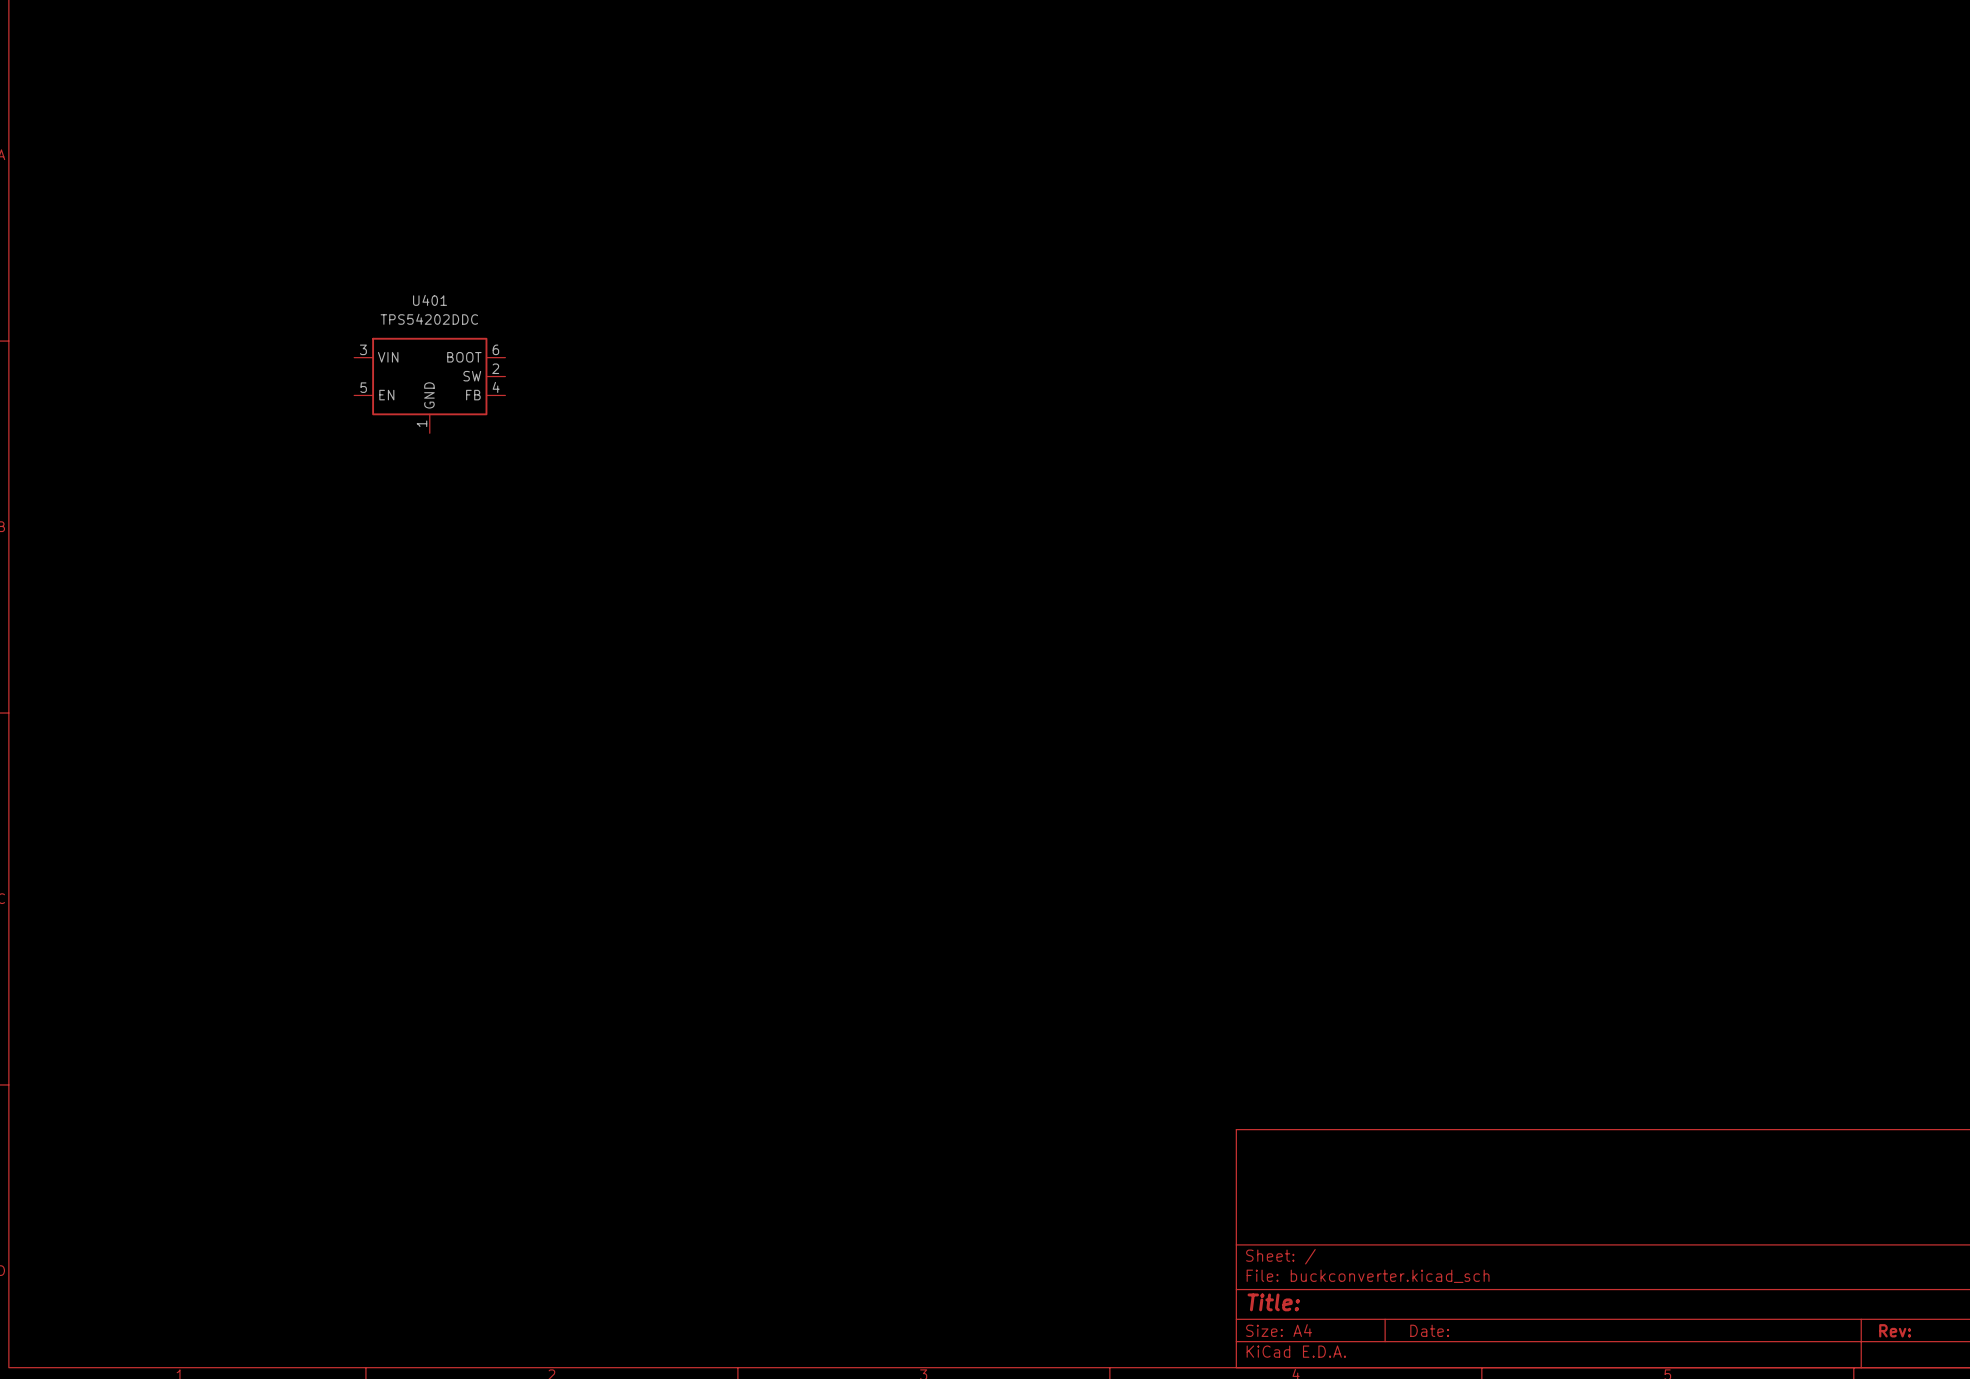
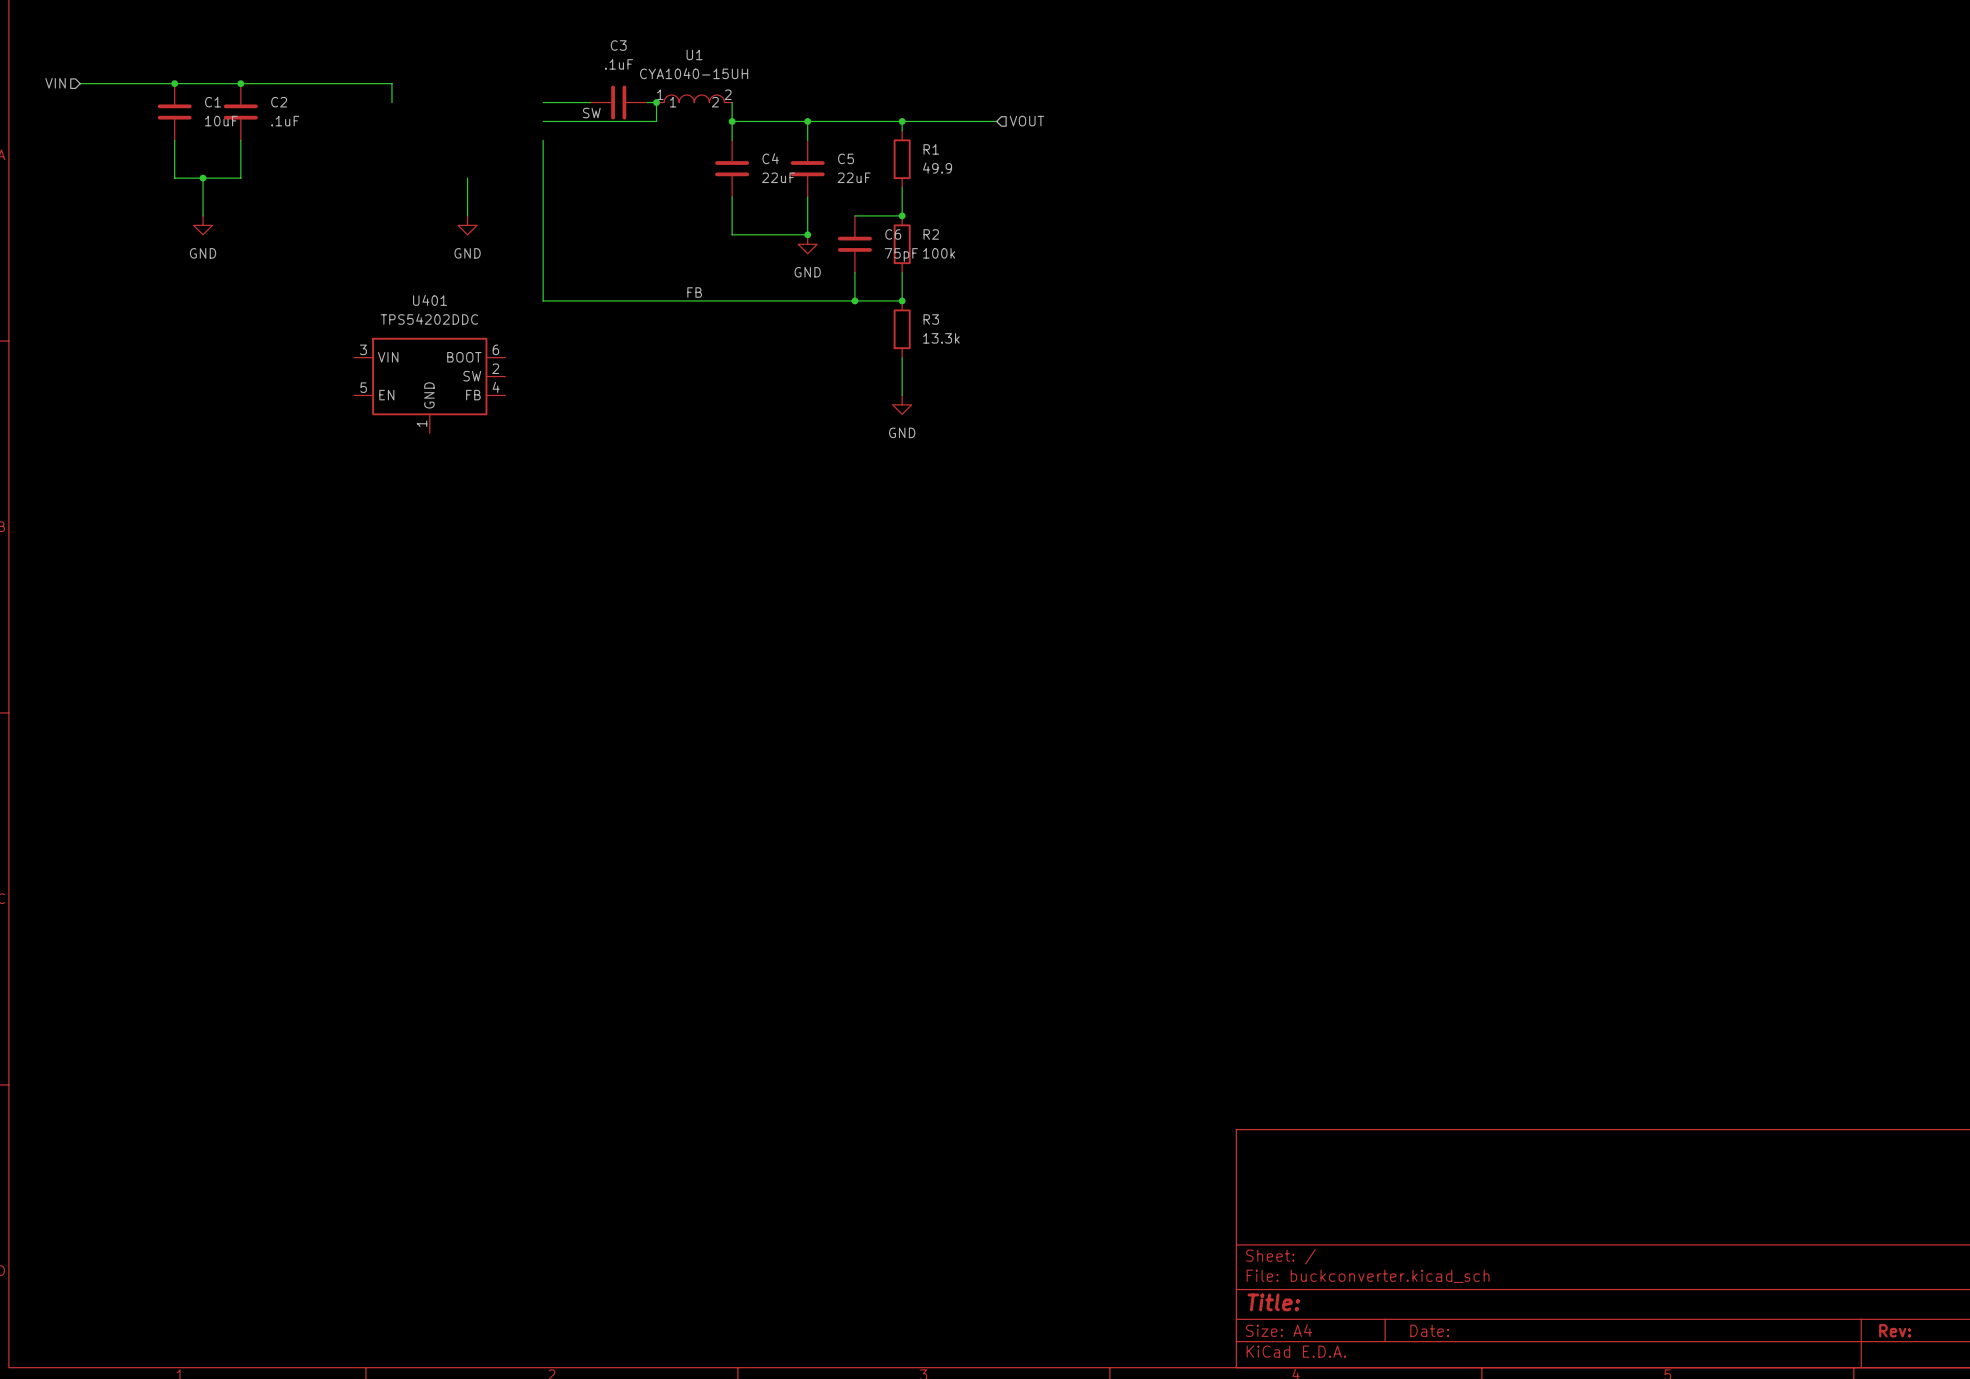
hierarchical label: none -> VIN (55, 83)
wire: none -> (80, 83) (391, 83) (391, 102)
junction: none -> (174, 83)
junction: none -> (240, 83)
U1: none -> CYA1040-15UH (694, 98)
wire: none -> (543, 102) (590, 102)
C3: none -> .1uF (618, 102)
wire: none -> (647, 102) (656, 102) (656, 121) (543, 121)
junction: none -> (656, 102)
wire: none -> (732, 102) (732, 140)
C1: none -> 10uF (174, 112)
C2: none -> .1uF (240, 112)
label: none -> SW (591, 113)
wire: none -> (732, 121) (996, 121)
junction: none -> (732, 121)
wire: none -> (807, 121) (807, 140)
junction: none -> (807, 121)
wire: none -> (902, 121) (902, 130)
junction: none -> (902, 121)
hierarchical label: none -> VOUT (1026, 121)
wire: none -> (174, 140) (174, 178) (240, 178) (240, 140)
wire: none -> (543, 140) (543, 300) (902, 300) (902, 272)
R1: none -> 49.9 (902, 159)
C4: none -> 22uF (732, 168)
C5: none -> 22uF (807, 168)
wire: none -> (203, 178) (203, 215)
junction: none -> (203, 178)
wire: none -> (467, 178) (467, 215)
wire: none -> (902, 187) (902, 215) (854, 215)
wire: none -> (732, 197) (732, 234) (807, 234) (807, 197)
junction: none -> (902, 215)
power symbol: none -> GND (203, 225)
power symbol: none -> GND (467, 225)
junction: none -> (807, 234)
power symbol: none -> GND (807, 244)
C6: none -> 75pF (854, 244)
R2: none -> 100k (902, 244)
wire: none -> (854, 272) (854, 300)
label: none -> FB (694, 292)
junction: none -> (854, 300)
junction: none -> (902, 300)
R3: none -> 13.3k (902, 329)
wire: none -> (902, 357) (902, 395)
power symbol: none -> GND (902, 404)

